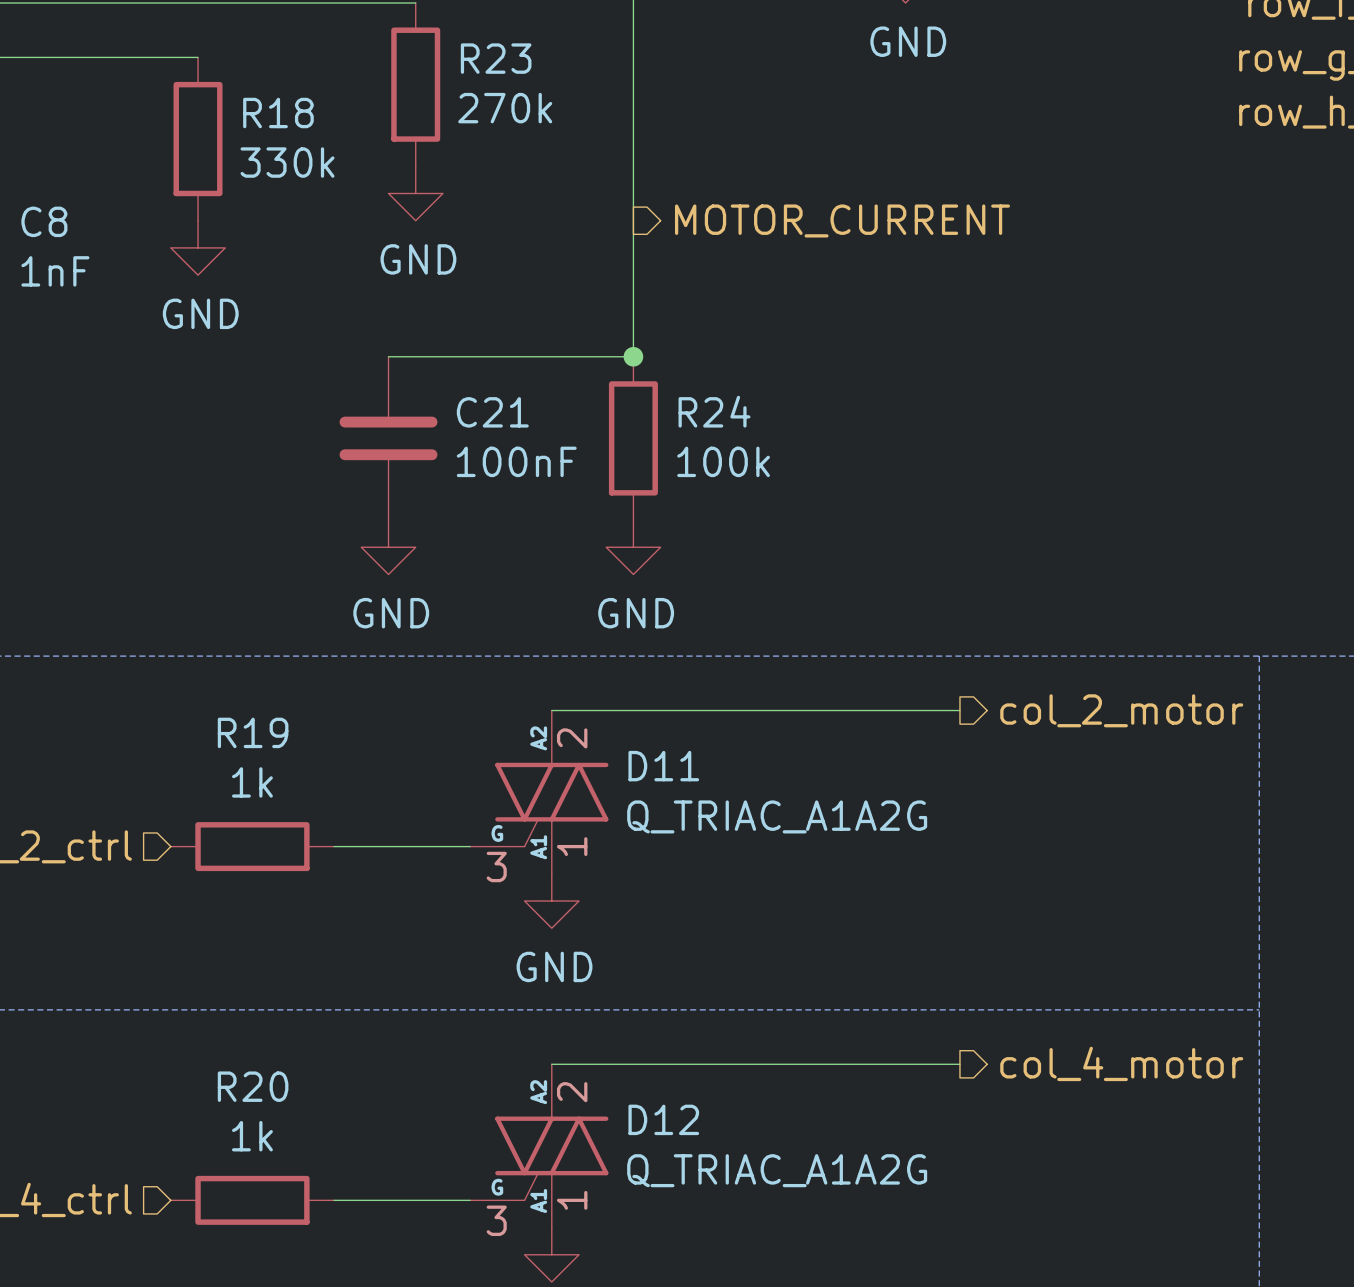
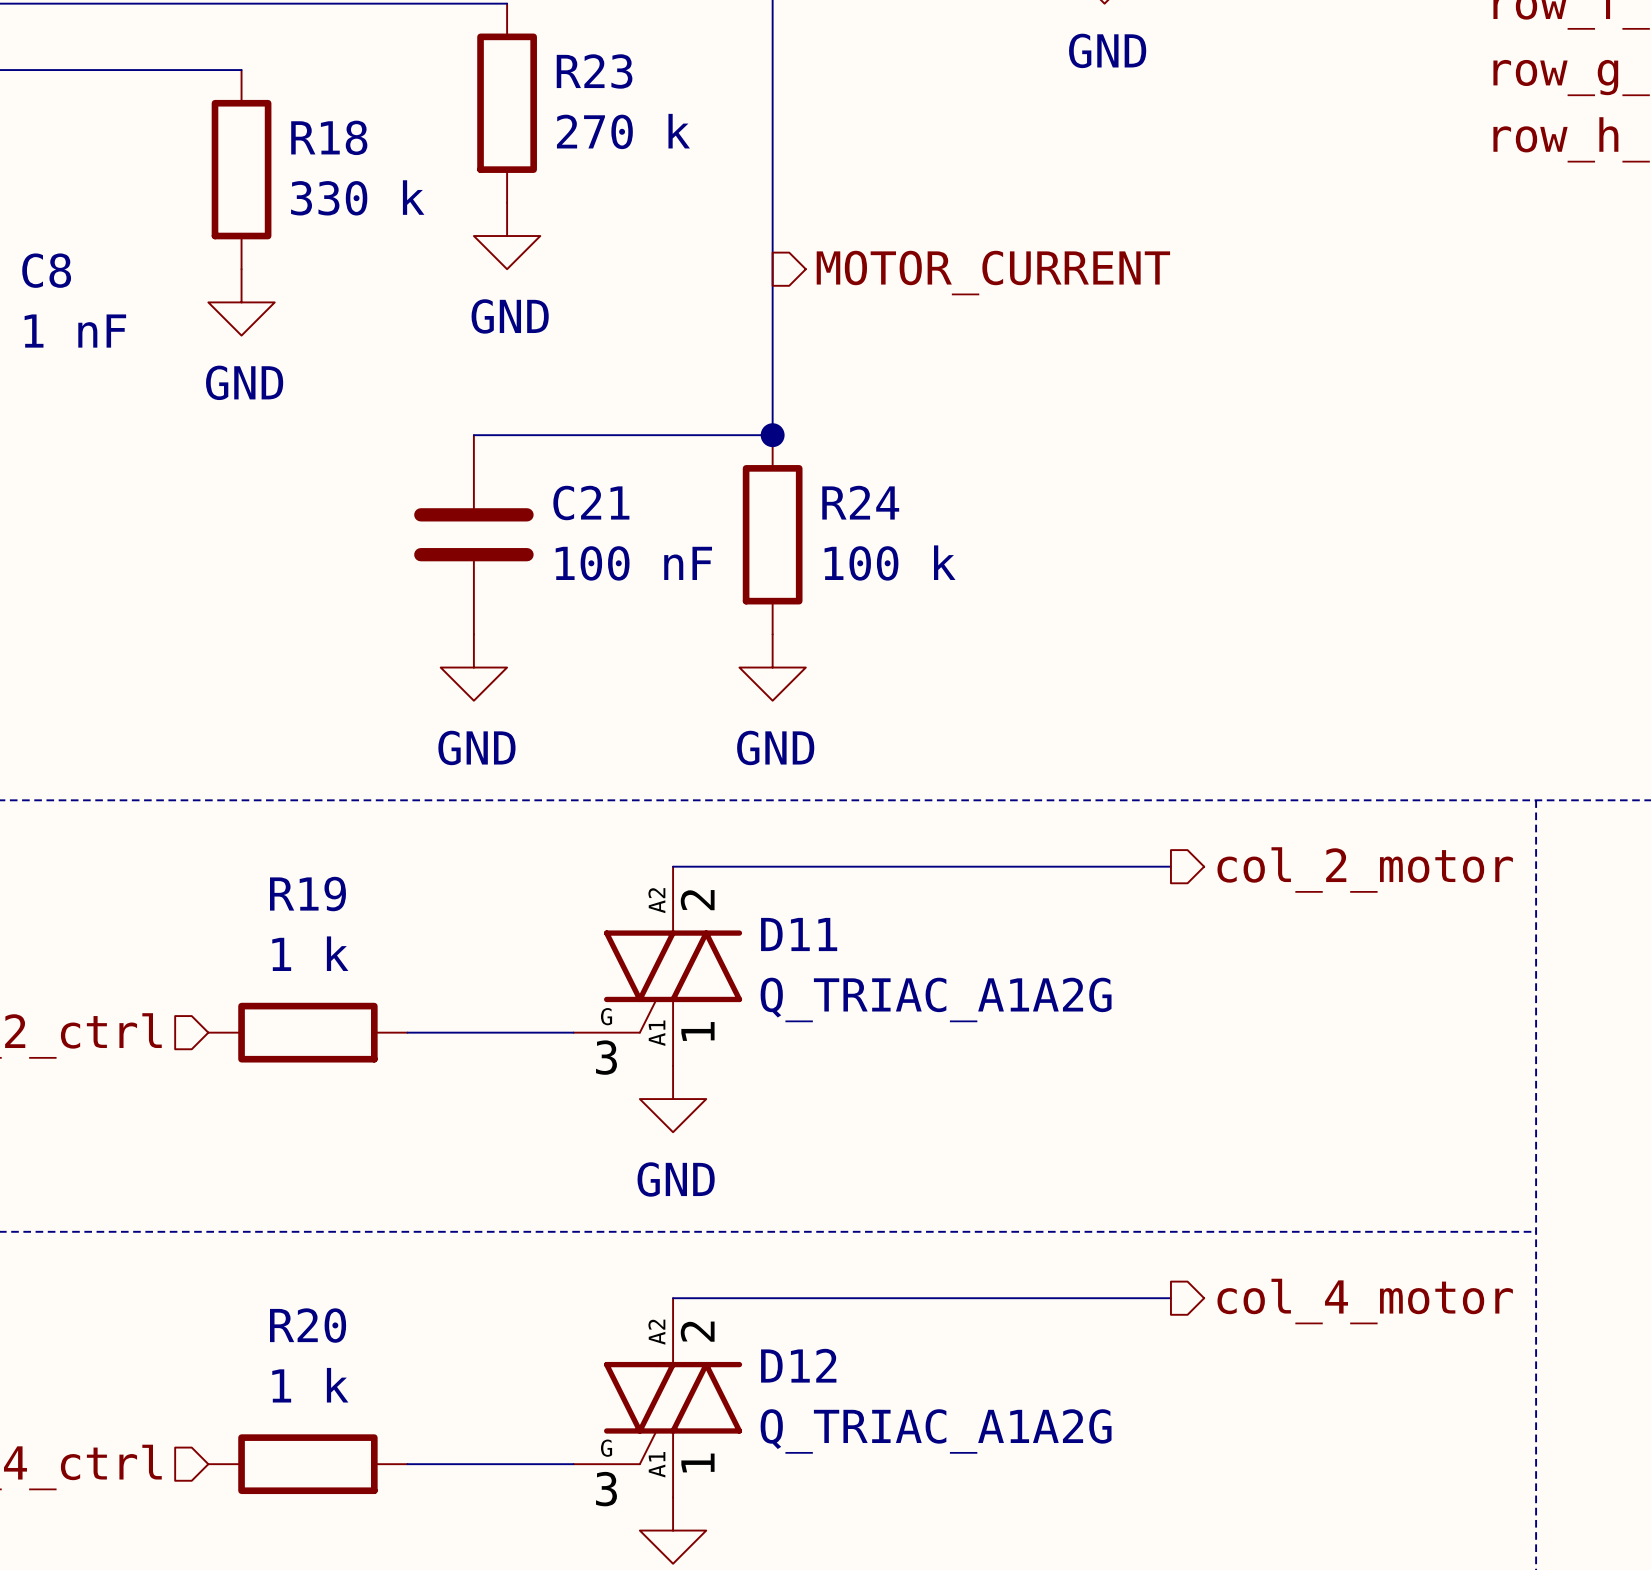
R23 value: 270k (505, 108) -> 270 k (623, 131)
R18 value: 330k (287, 162) -> 330 k (357, 197)
C8 value: 1nF (55, 271) -> 1 nF (75, 331)
C21 value: 100nF (516, 461) -> 100 nF (633, 563)
R24 value: 100k (723, 461) -> 100 k (890, 563)
R19 value: 1k (252, 782) -> 1 k (310, 953)
R20 value: 1k (252, 1136) -> 1 k (310, 1385)

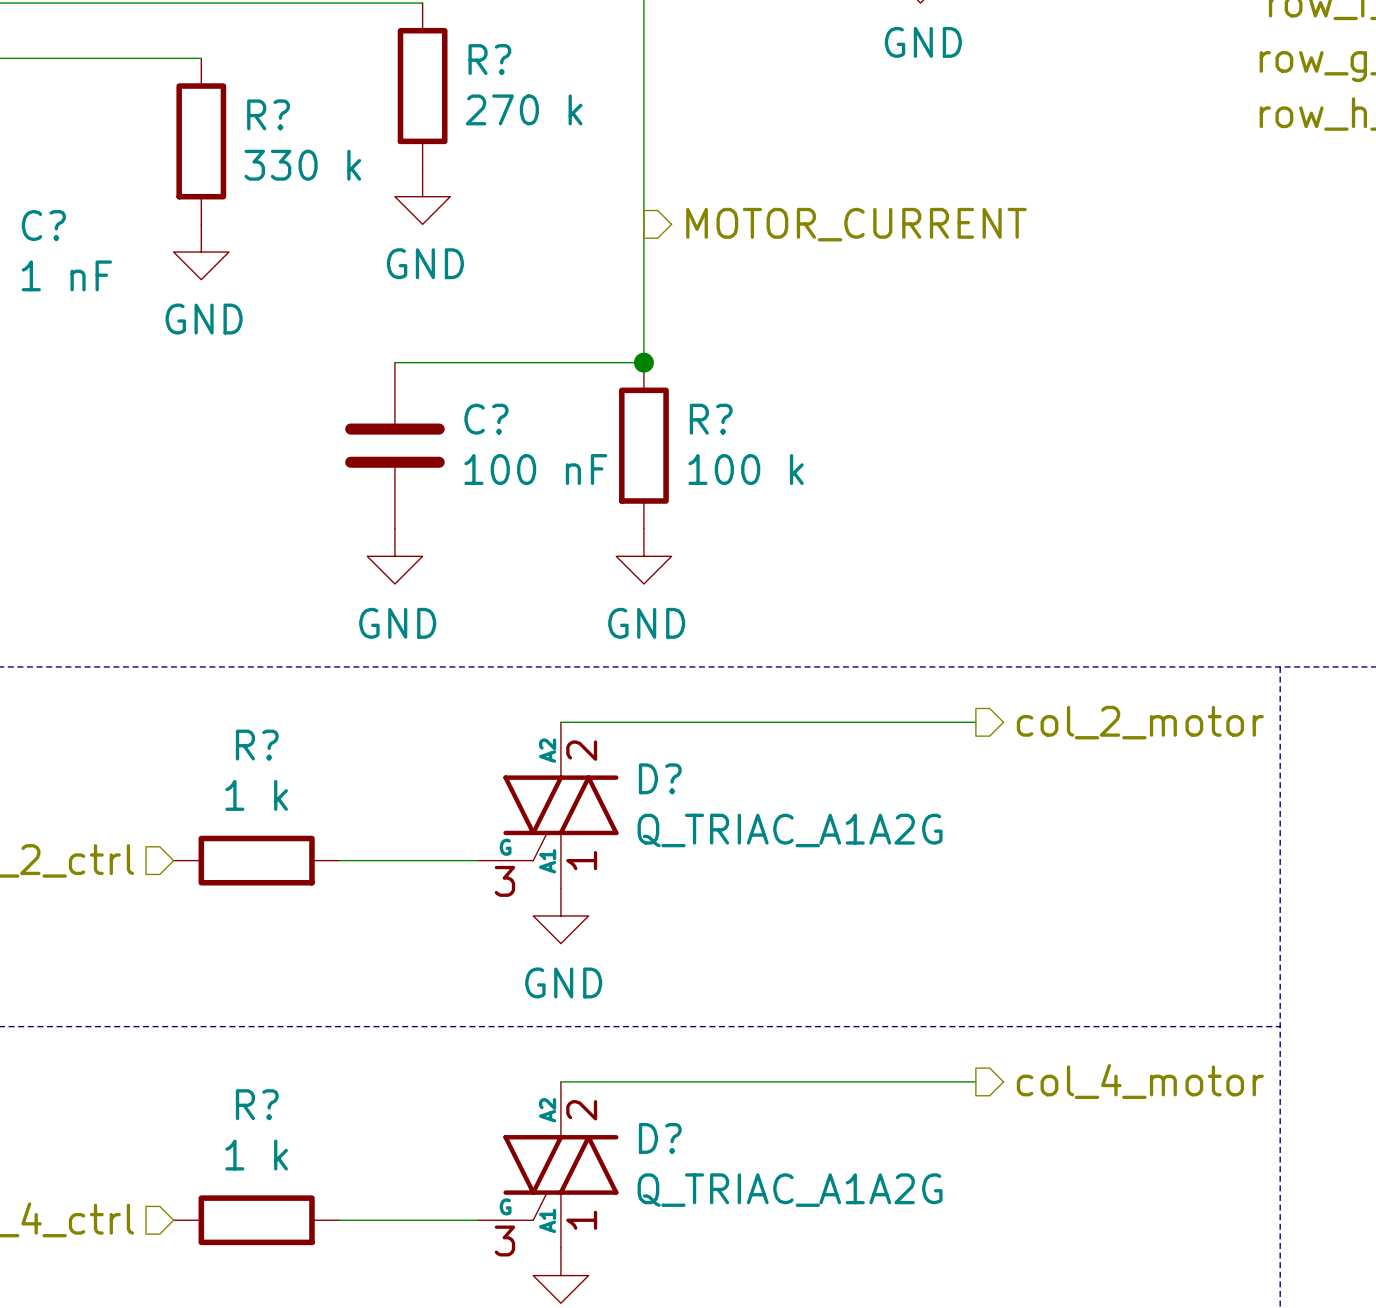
R23 name: R23 (594, 71) -> R? (489, 59)
R18 name: R18 (329, 137) -> R? (268, 114)
C8 name: C8 (46, 270) -> C? (43, 225)
R24 name: R24 (860, 502) -> R? (711, 419)
C21 name: C21 (591, 503) -> C? (486, 419)
R19 name: R19 (307, 894) -> R? (257, 745)
D11 name: D11 (799, 934) -> D? (660, 778)
R20 name: R20 (308, 1325) -> R? (257, 1104)
D12 name: D12 (798, 1365) -> D? (660, 1138)

